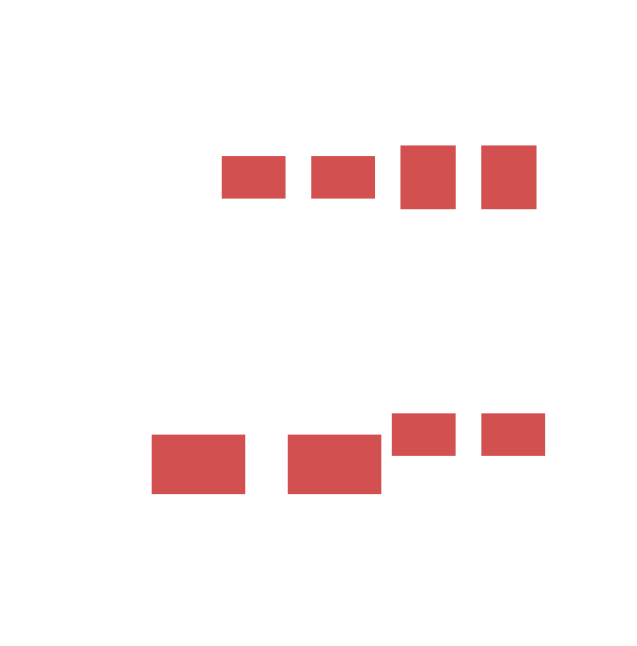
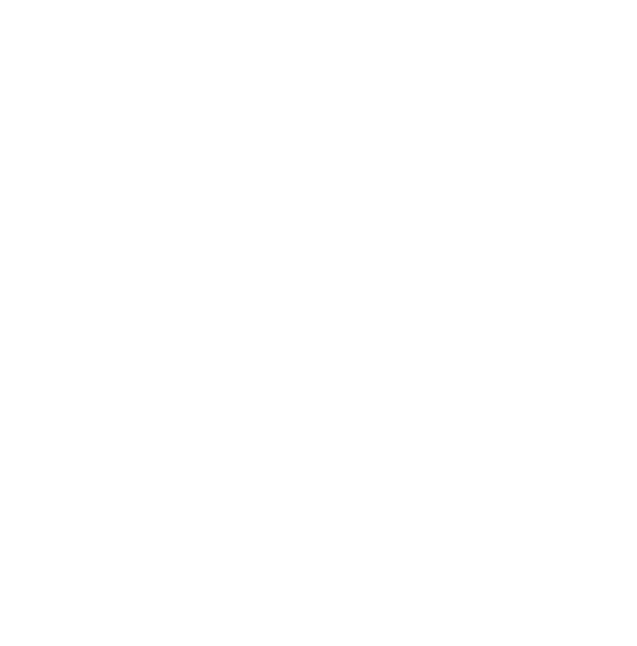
part: (298, 177) -> none
part: (468, 177) -> none
part: (468, 434) -> none
part: (266, 464) -> none

